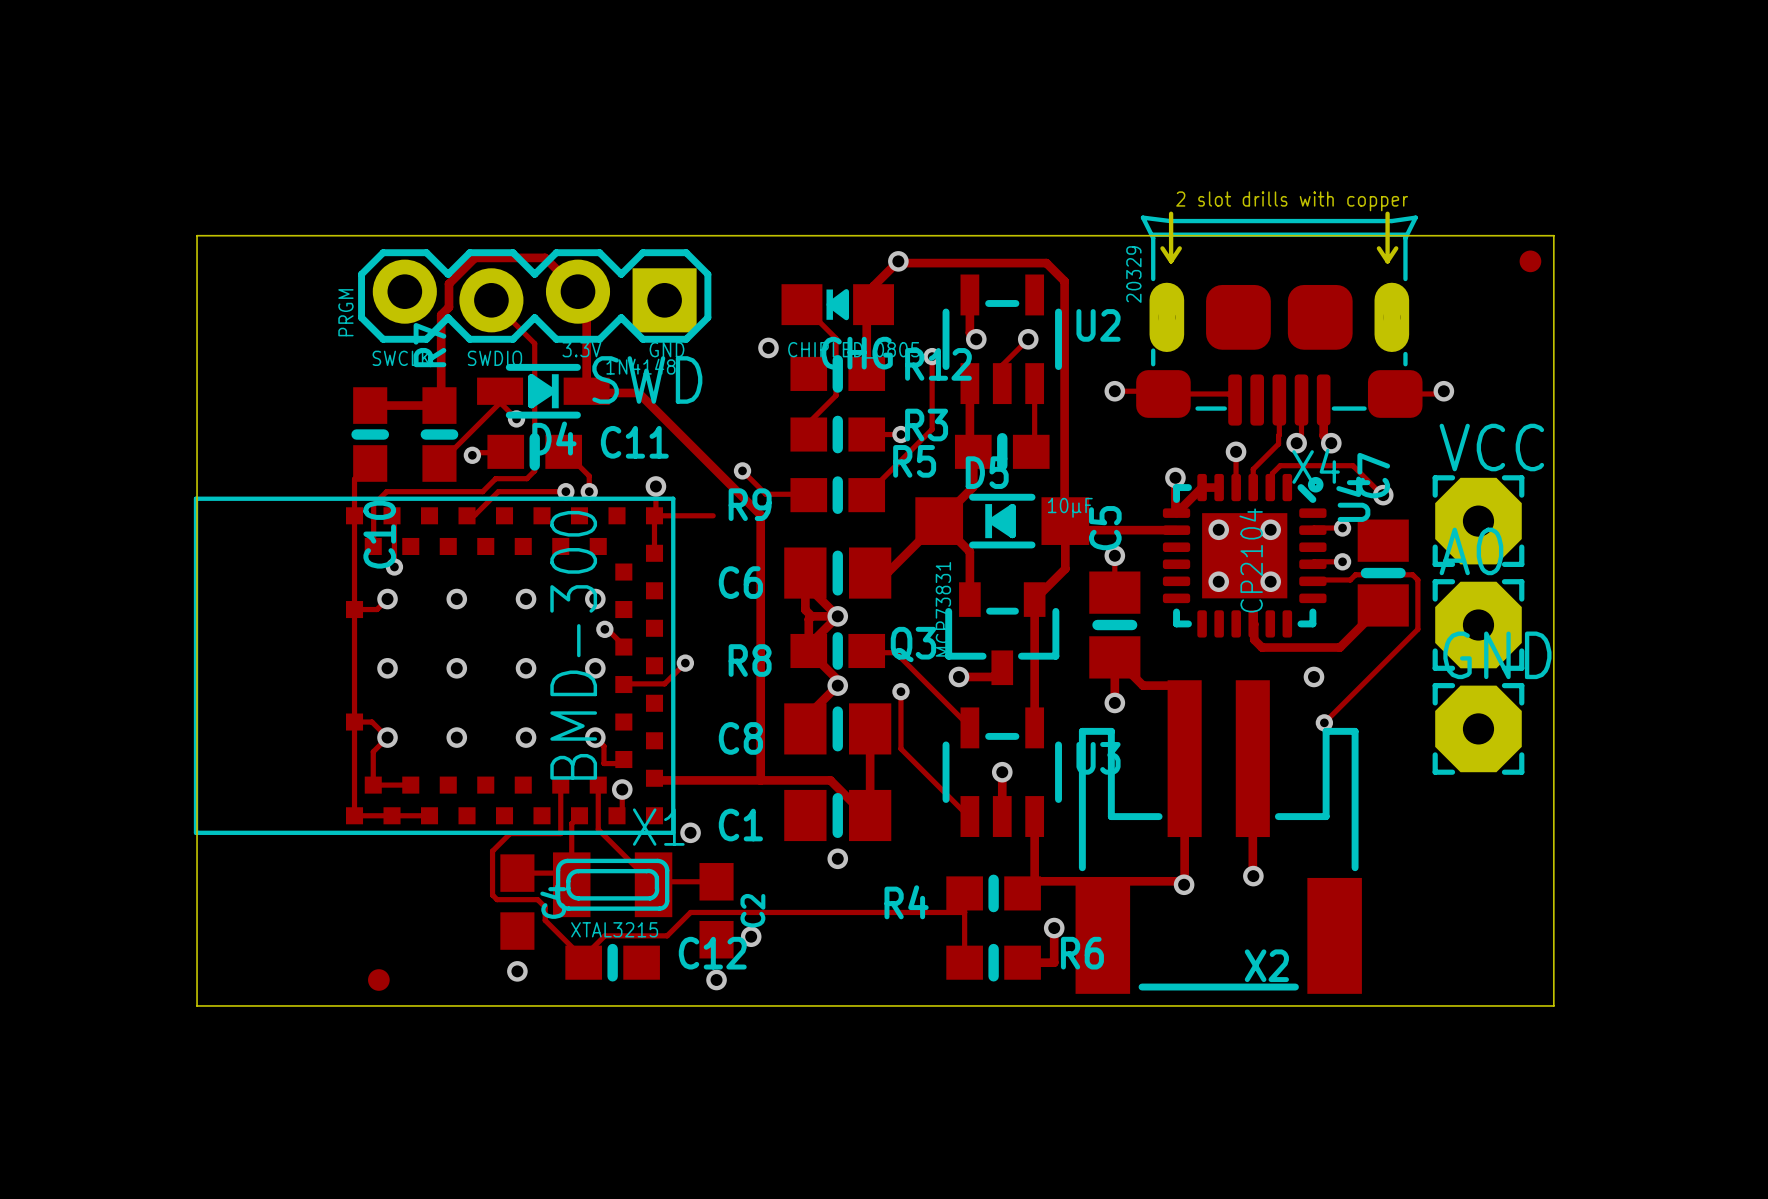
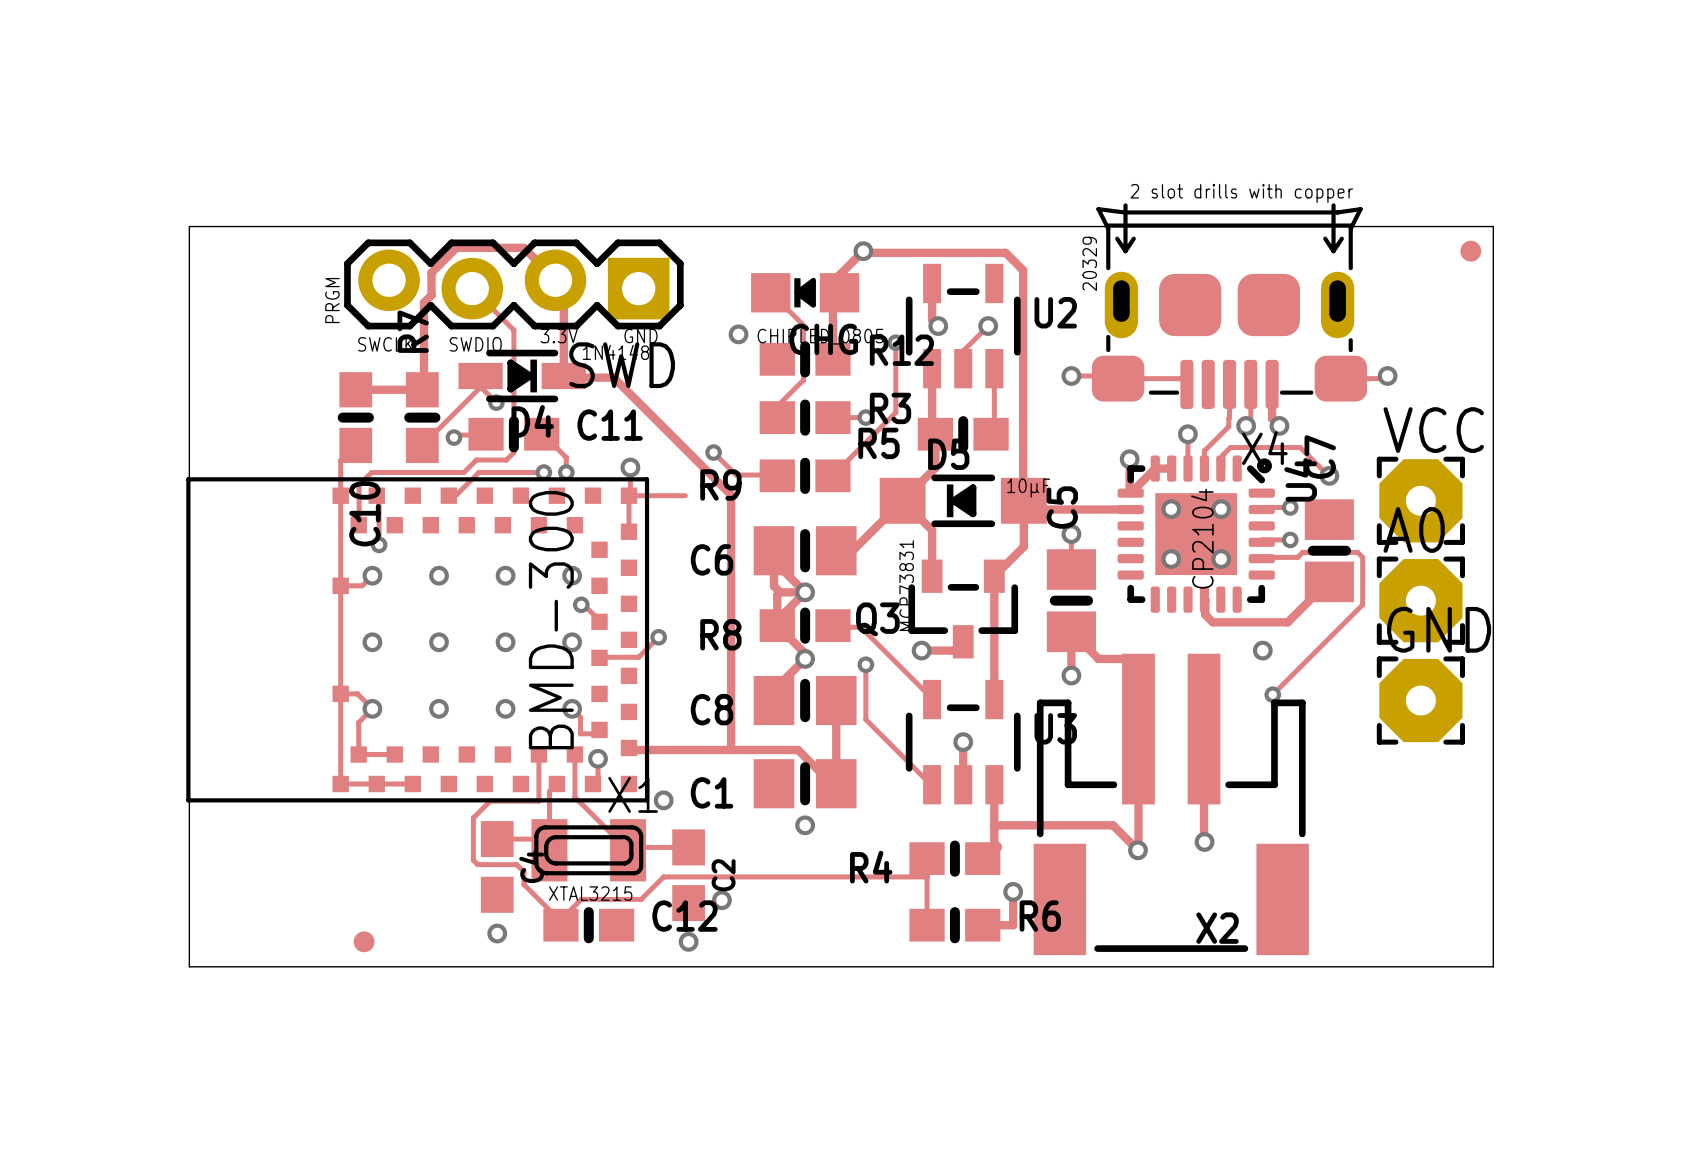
track: none -> (994, 825) (1113, 825) (1137, 850)
track: (1038, 881) (1181, 881) -> none

